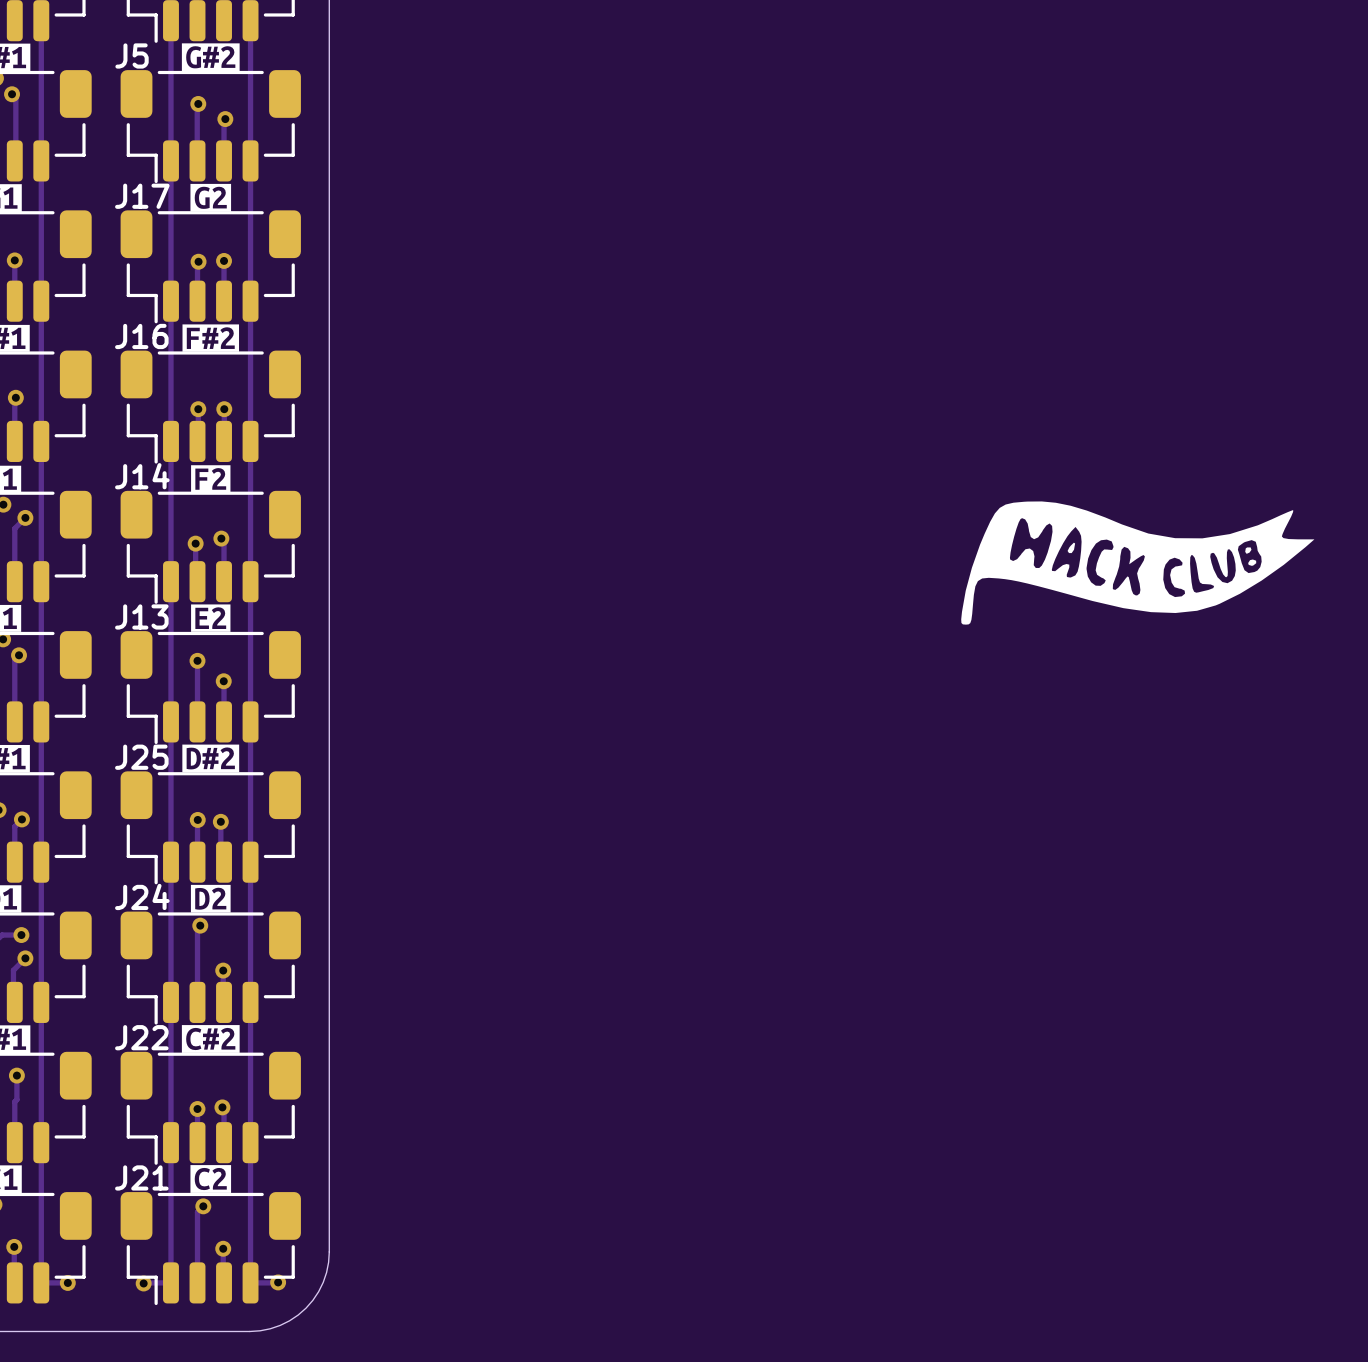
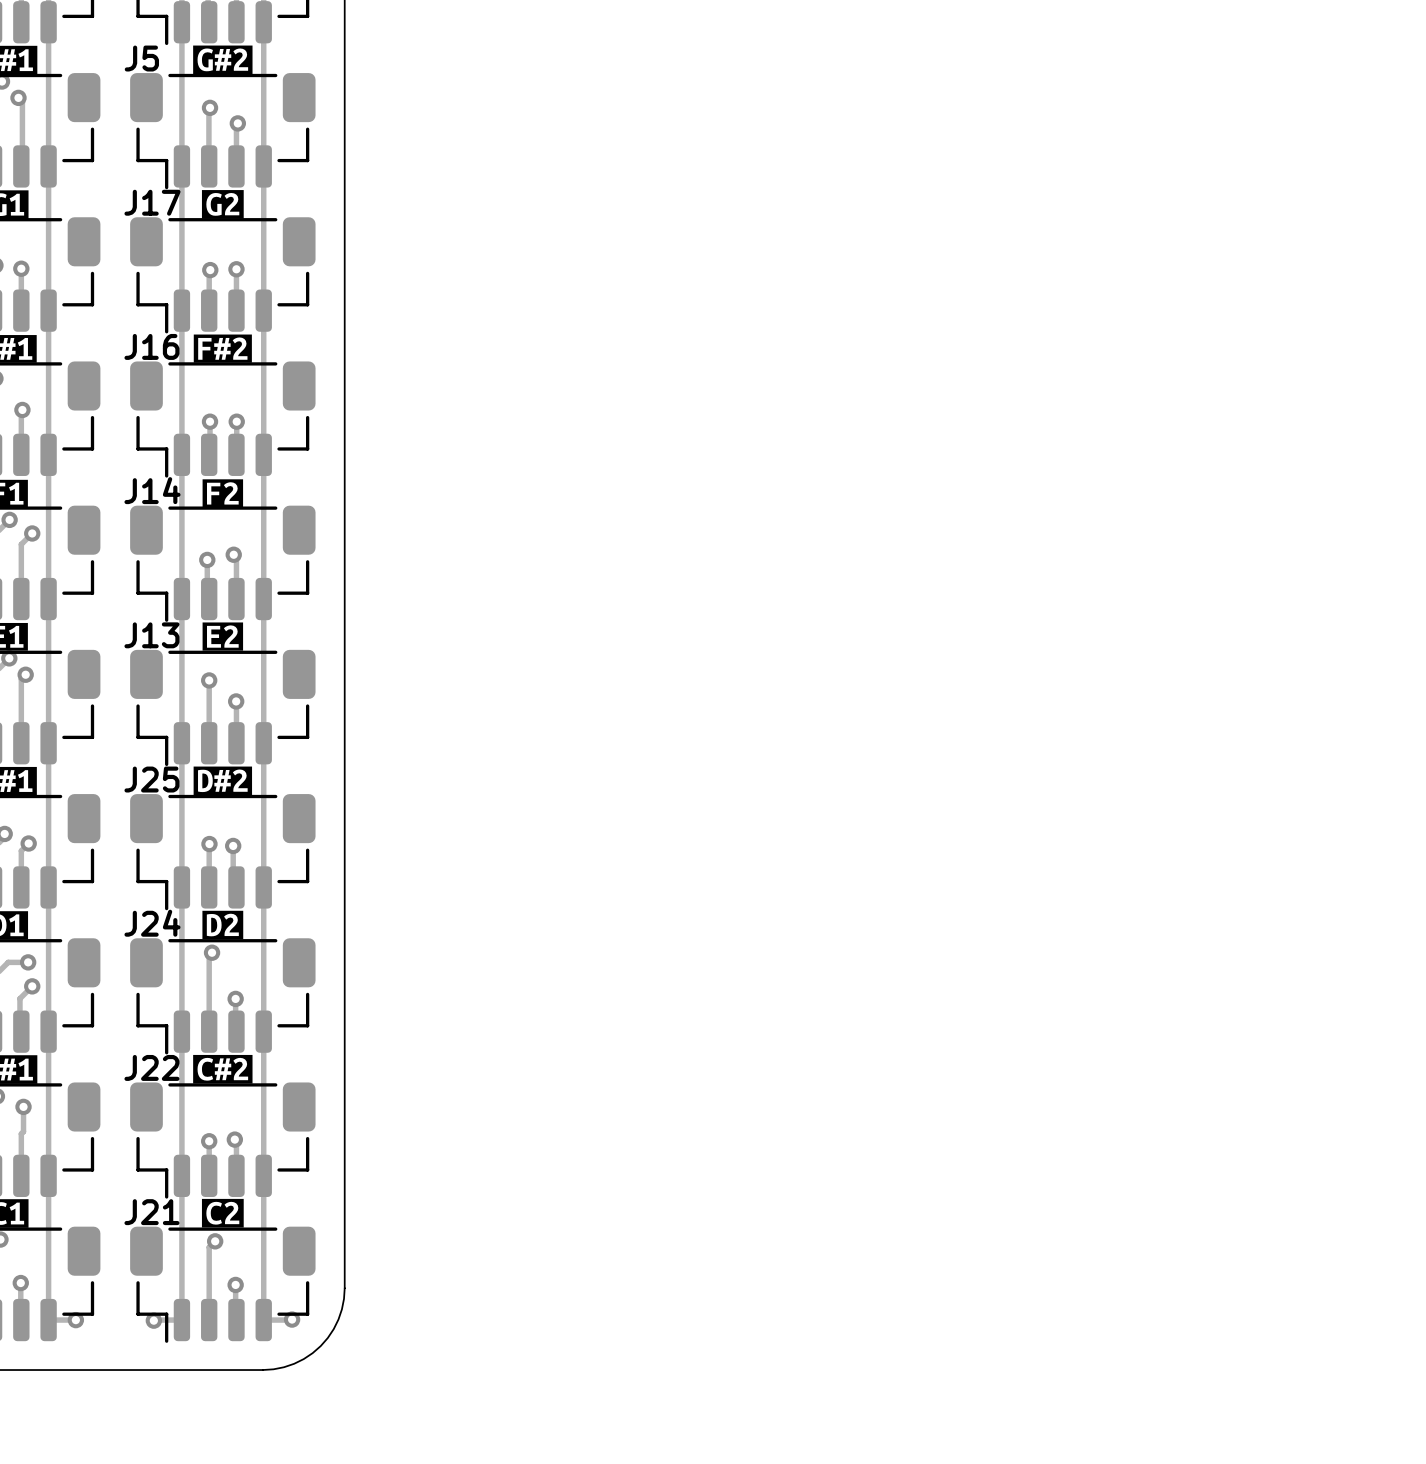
drawing: [961, 501, 1315, 625] -> none

